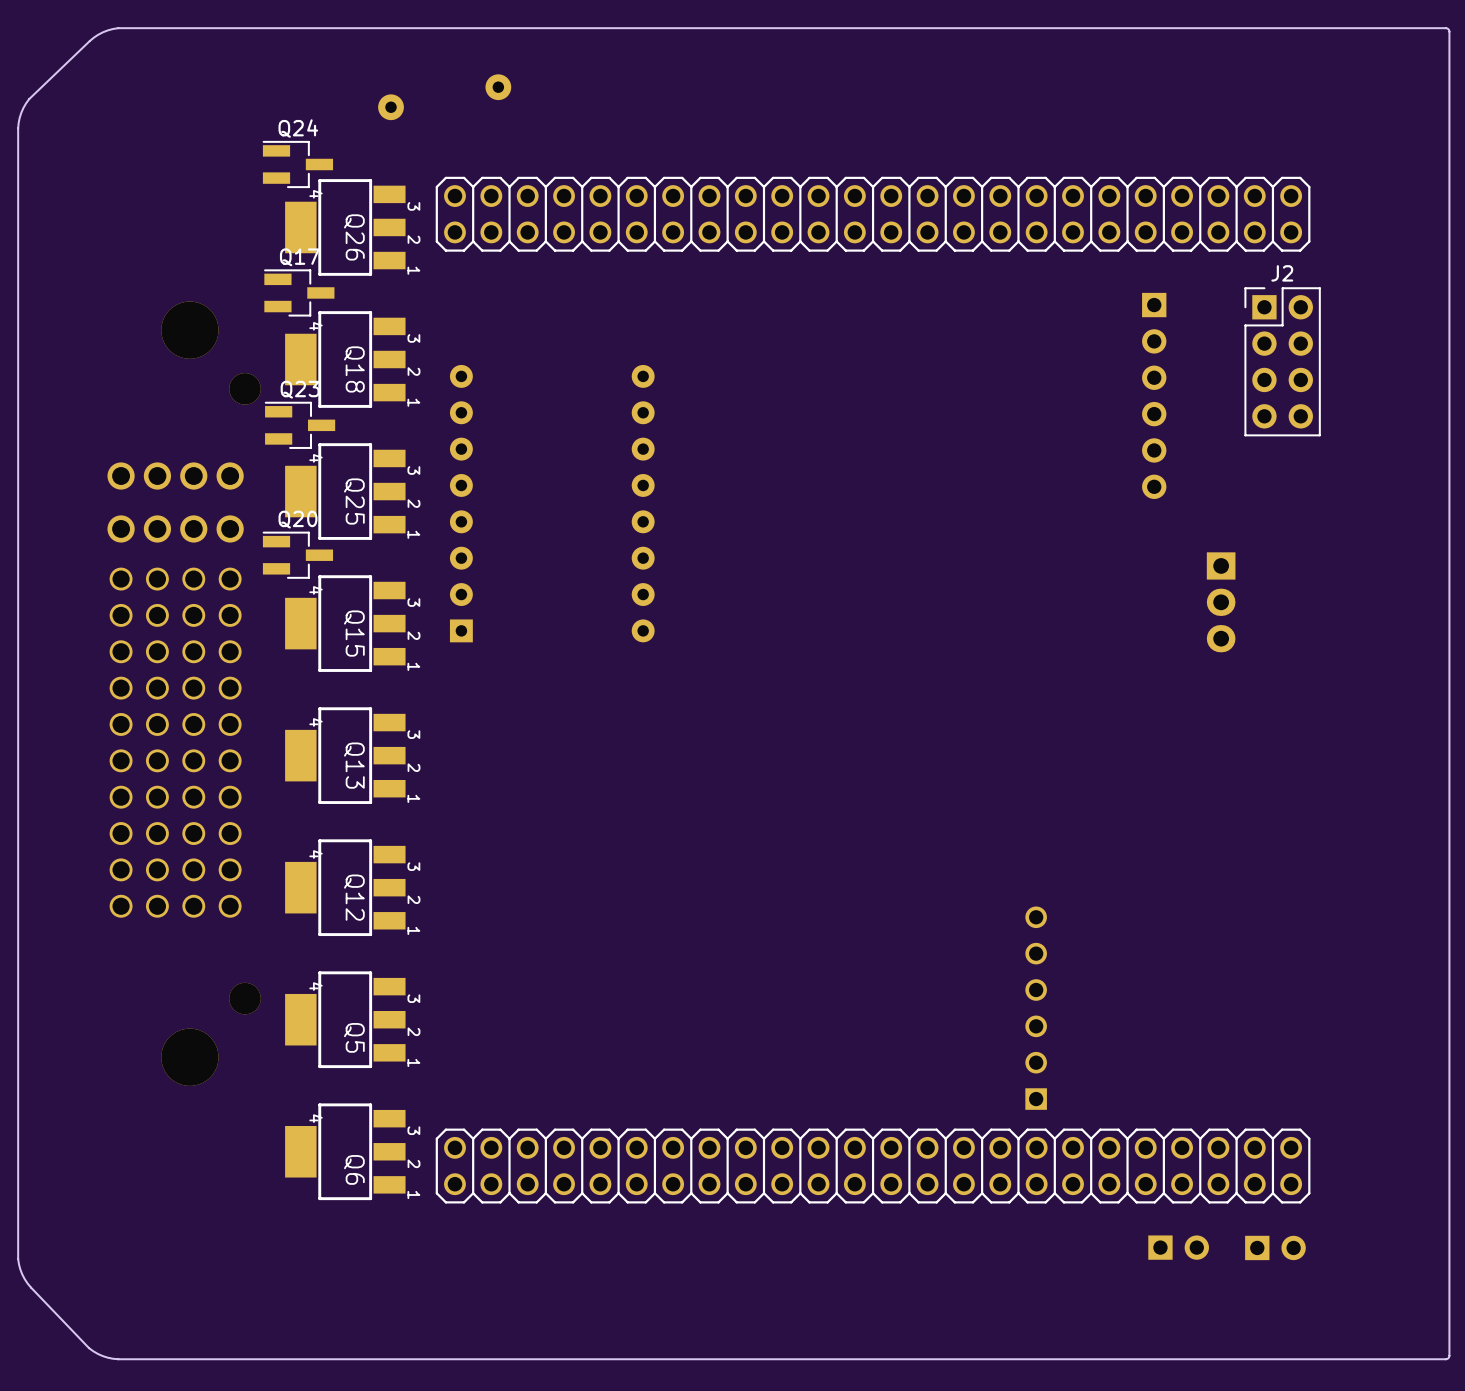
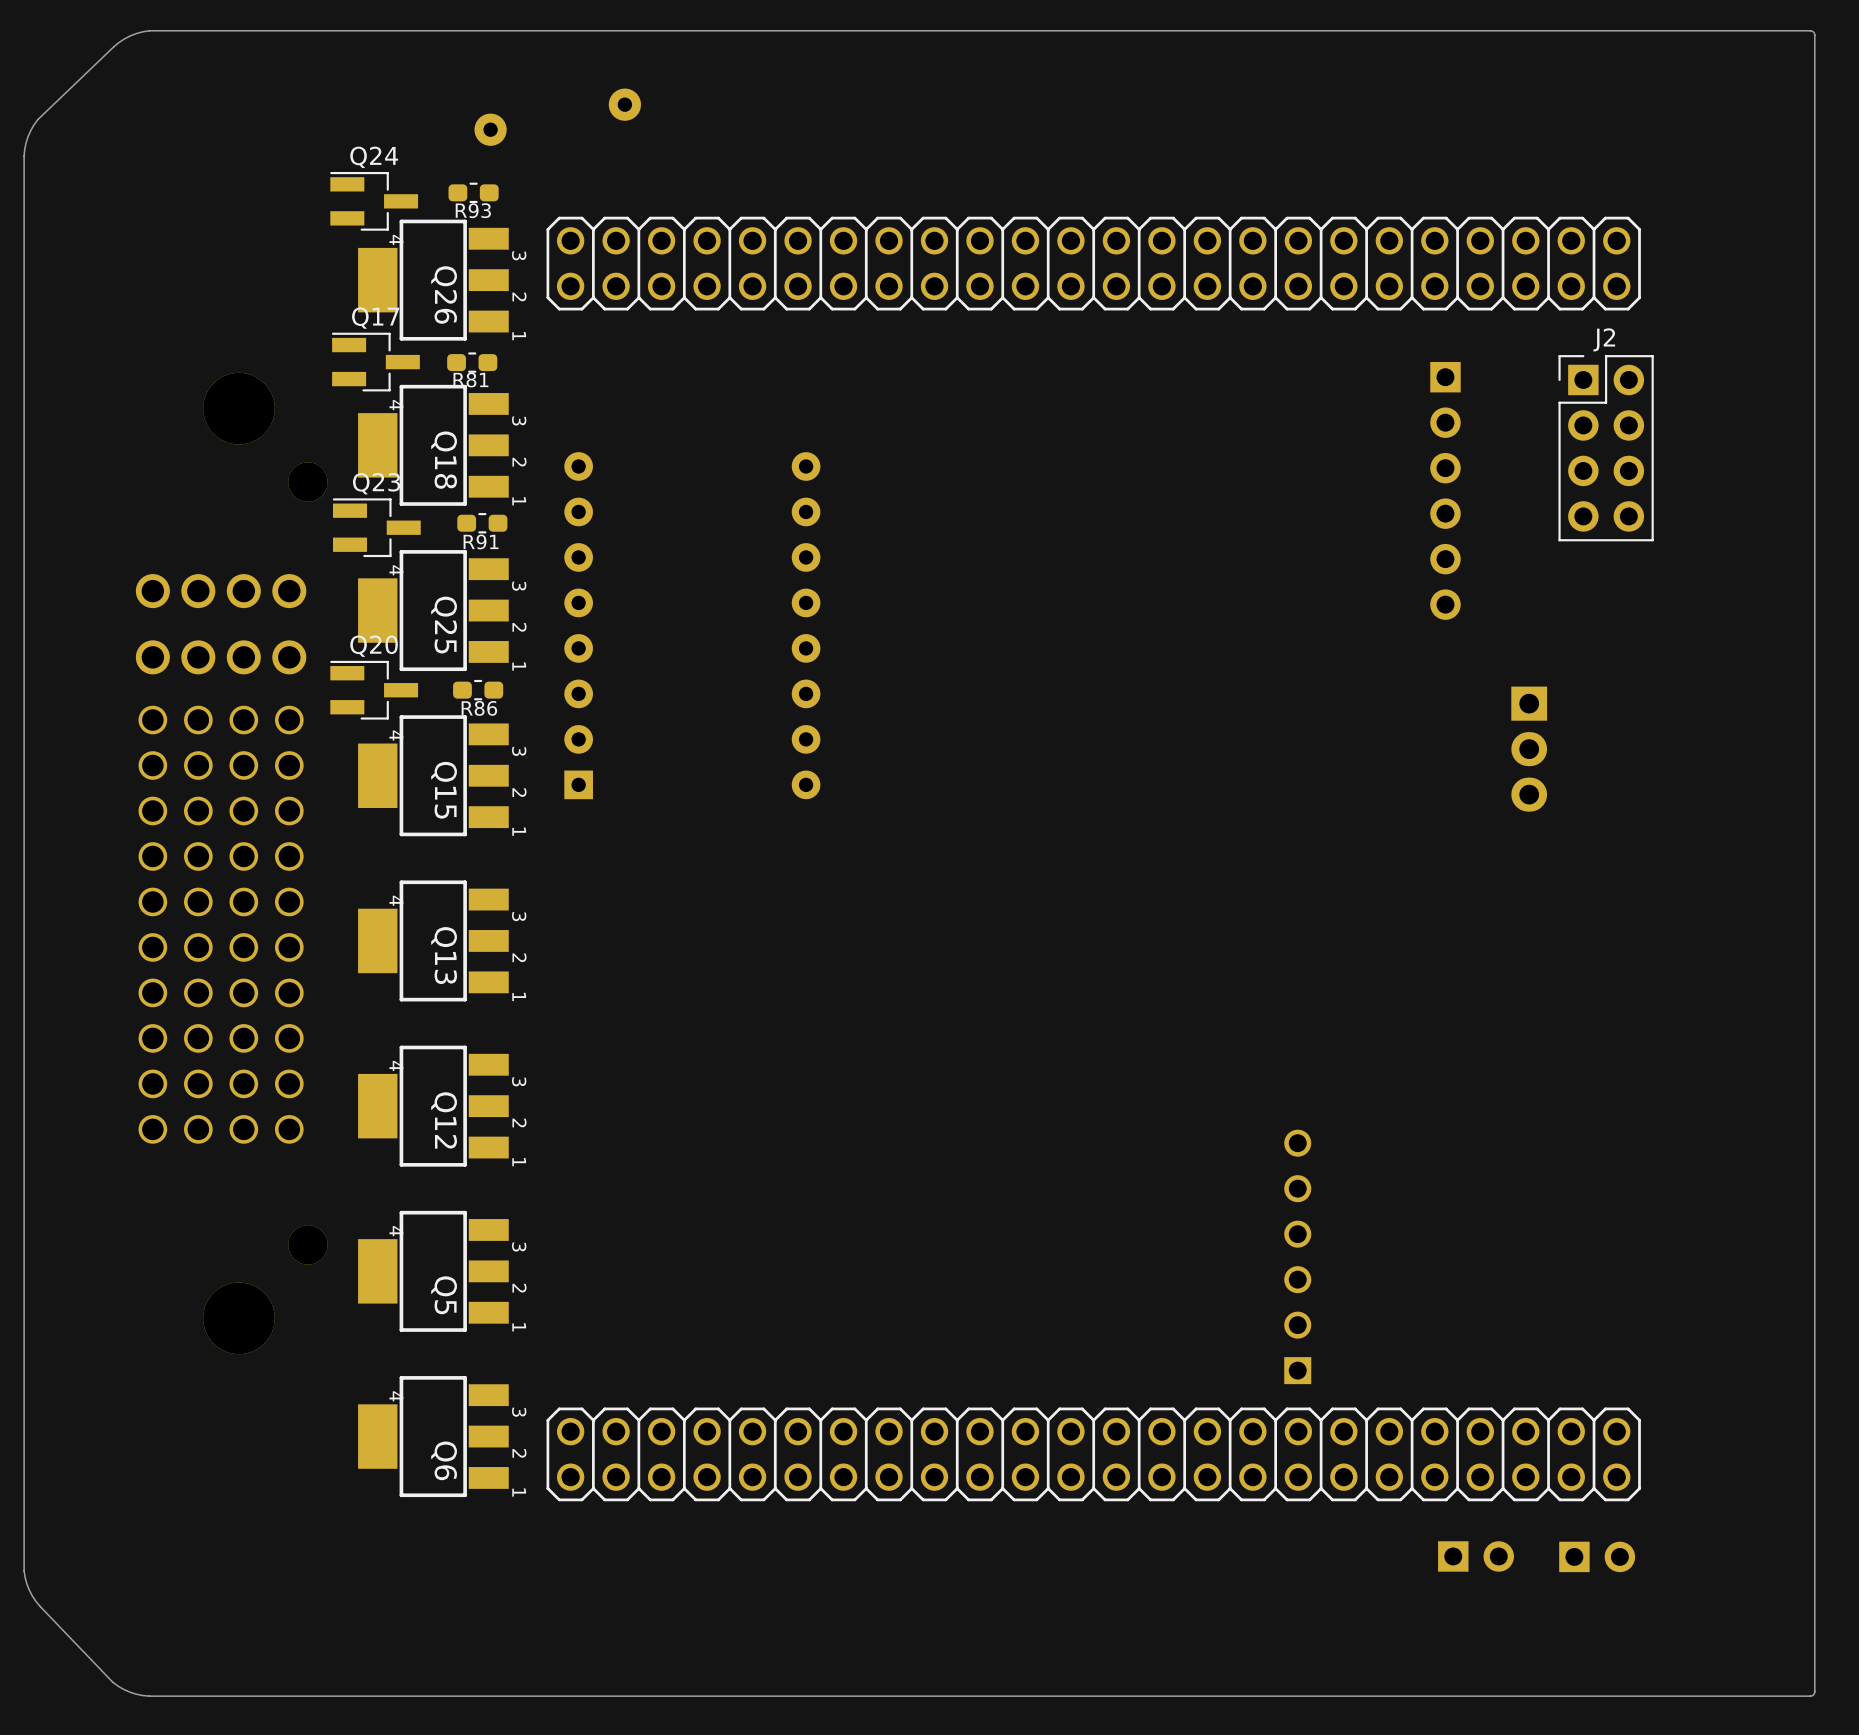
R93: none -> (473, 192)
R81: none -> (472, 362)
R91: none -> (482, 523)
R86: none -> (478, 690)

